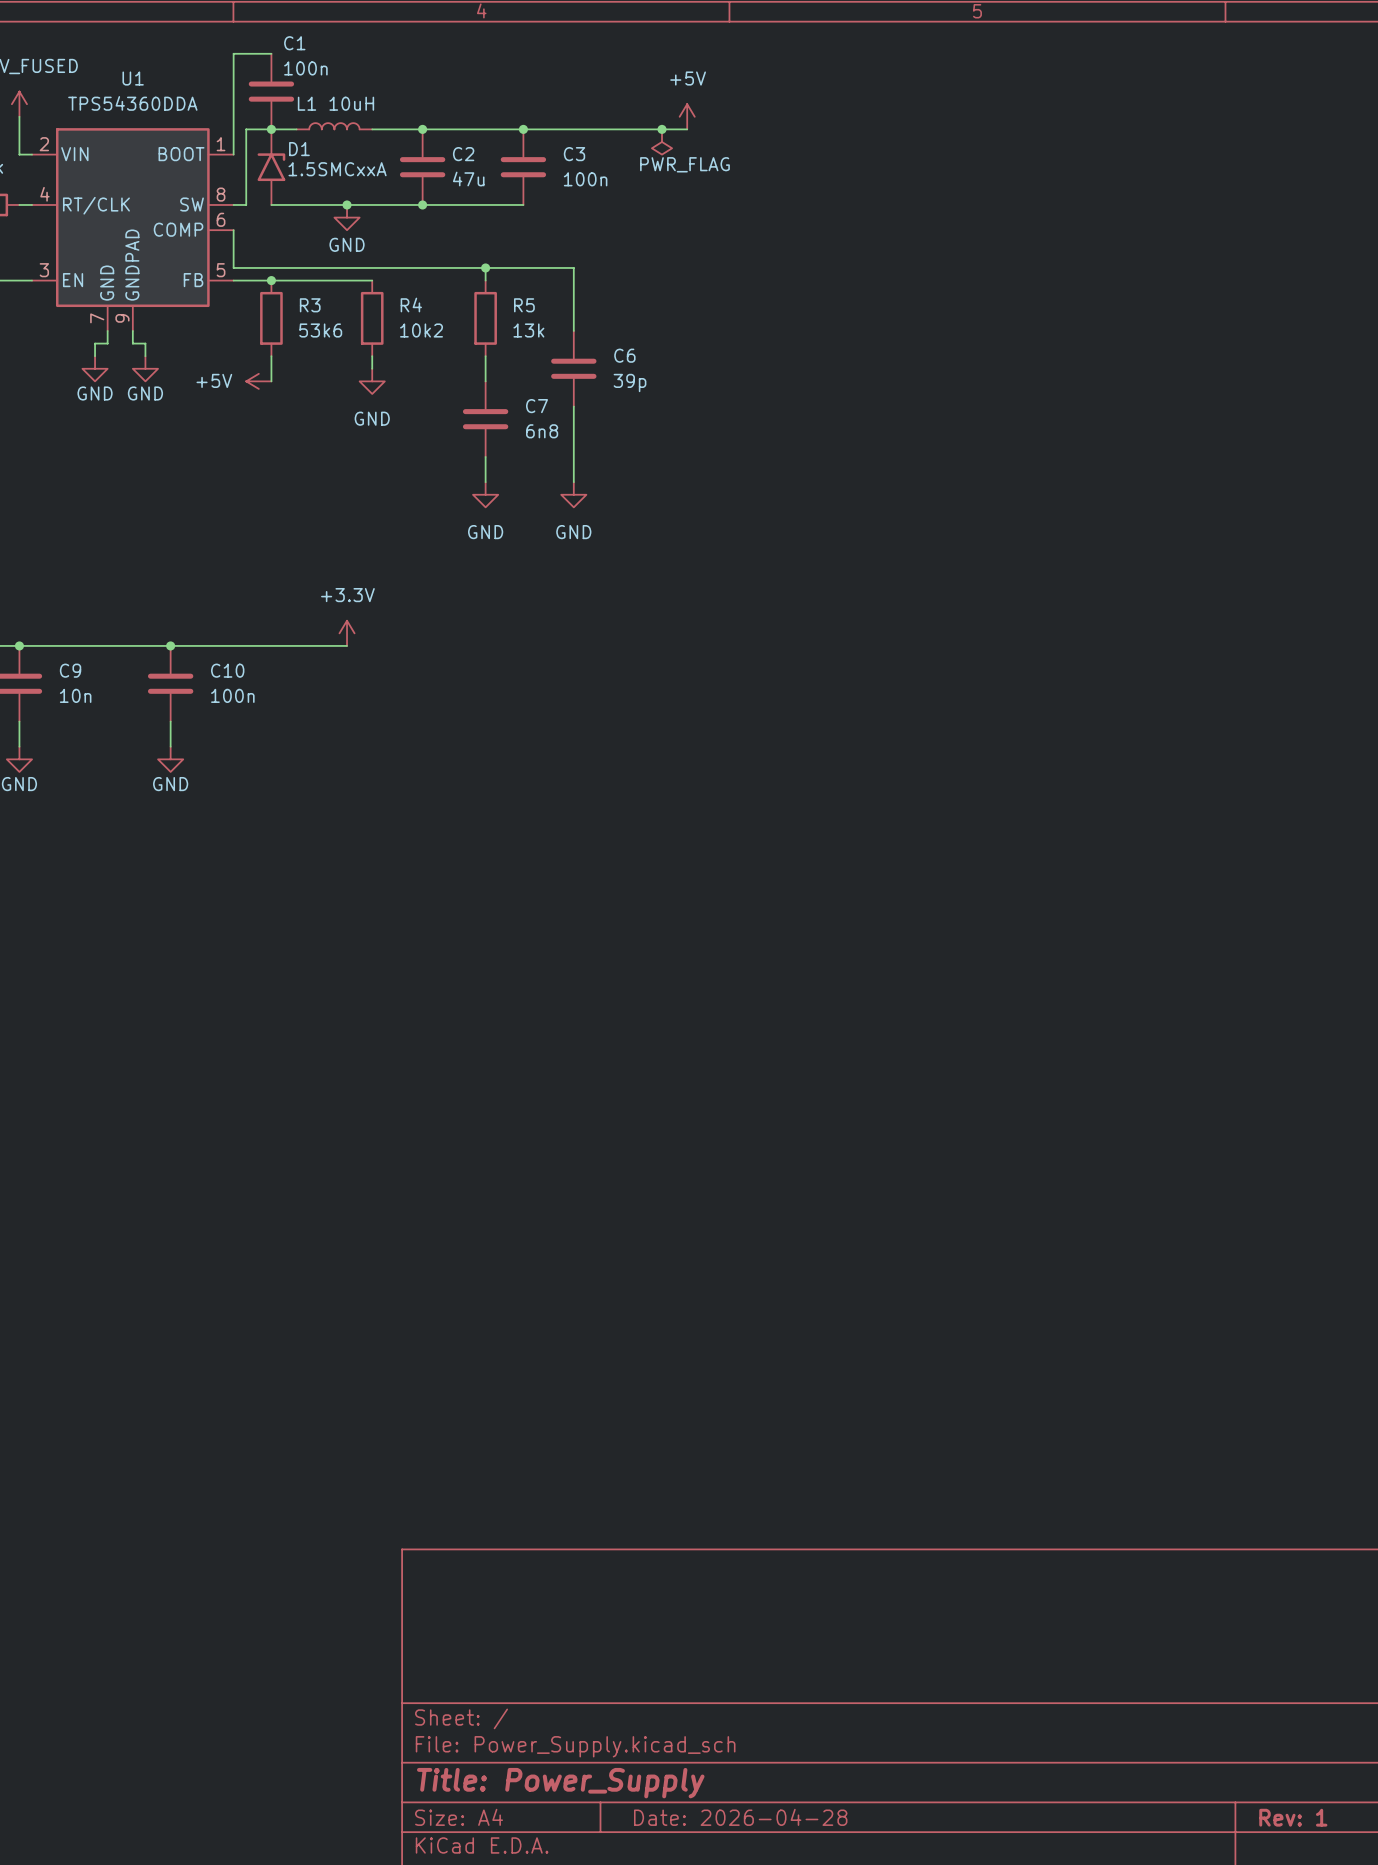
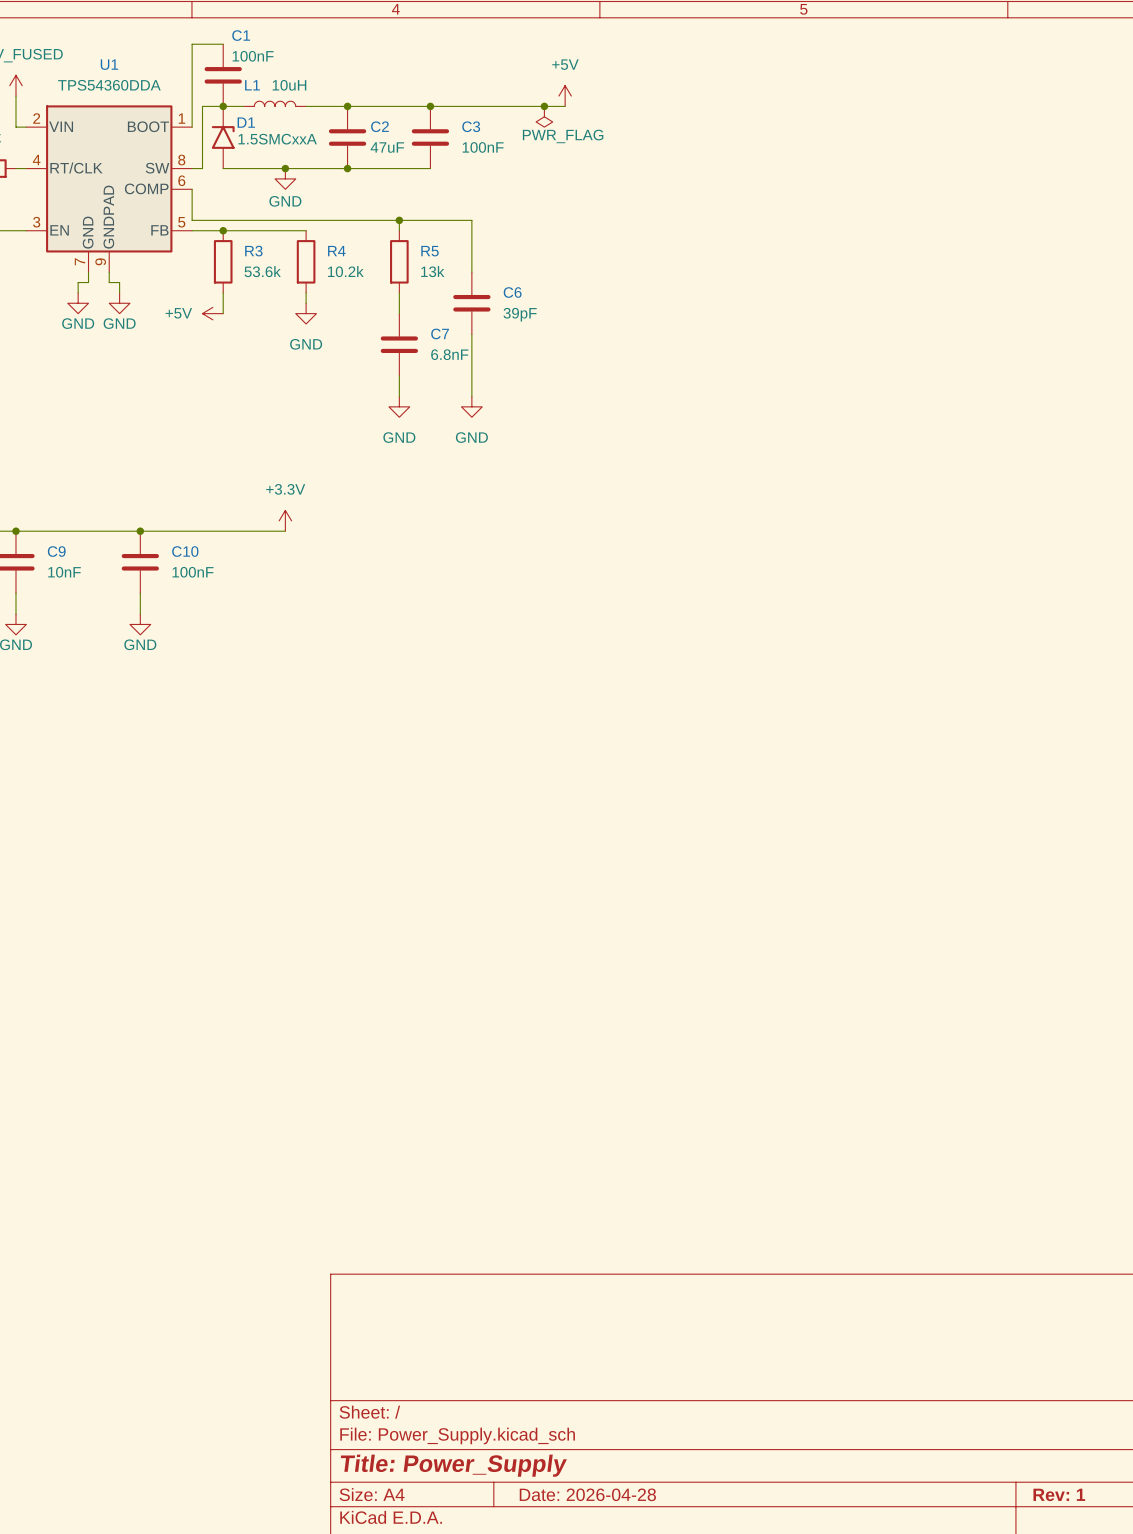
C1 value: 100n (305, 68) -> 100nF (253, 56)
C2 value: 47u (468, 179) -> 47uF (387, 147)
C3 value: 100n (585, 179) -> 100nF (483, 147)
R3 value: 53k6 (320, 330) -> 53.6k (262, 271)
R4 value: 10k2 (421, 330) -> 10.2k (345, 271)
C6 value: 39p (630, 383) -> 39pF (520, 314)
C7 value: 6n8 (542, 431) -> 6.8nF (449, 354)
C9 value: 10n (75, 695) -> 10nF (64, 572)
C10 value: 100n (232, 695) -> 100nF (193, 572)

